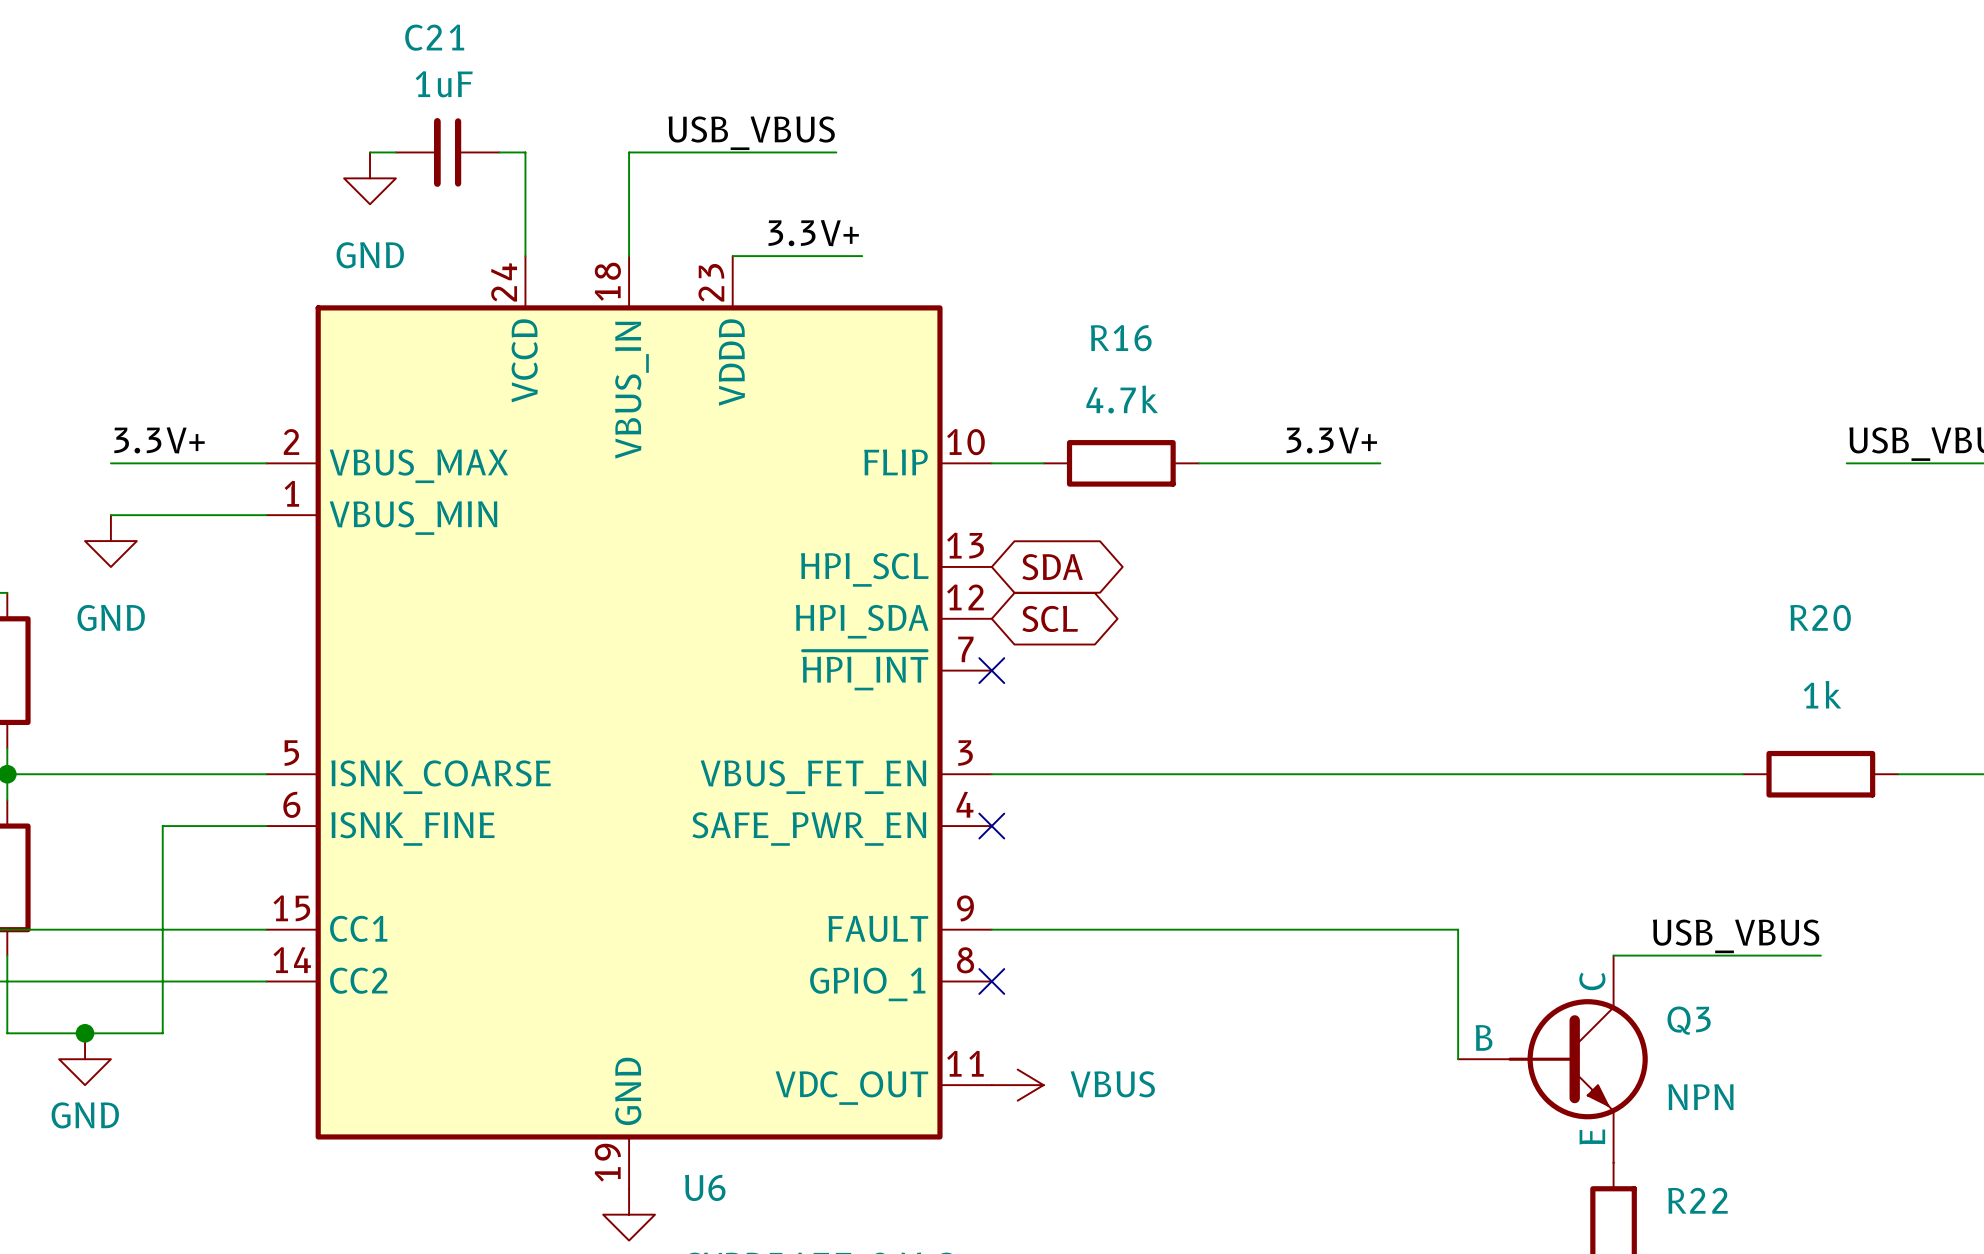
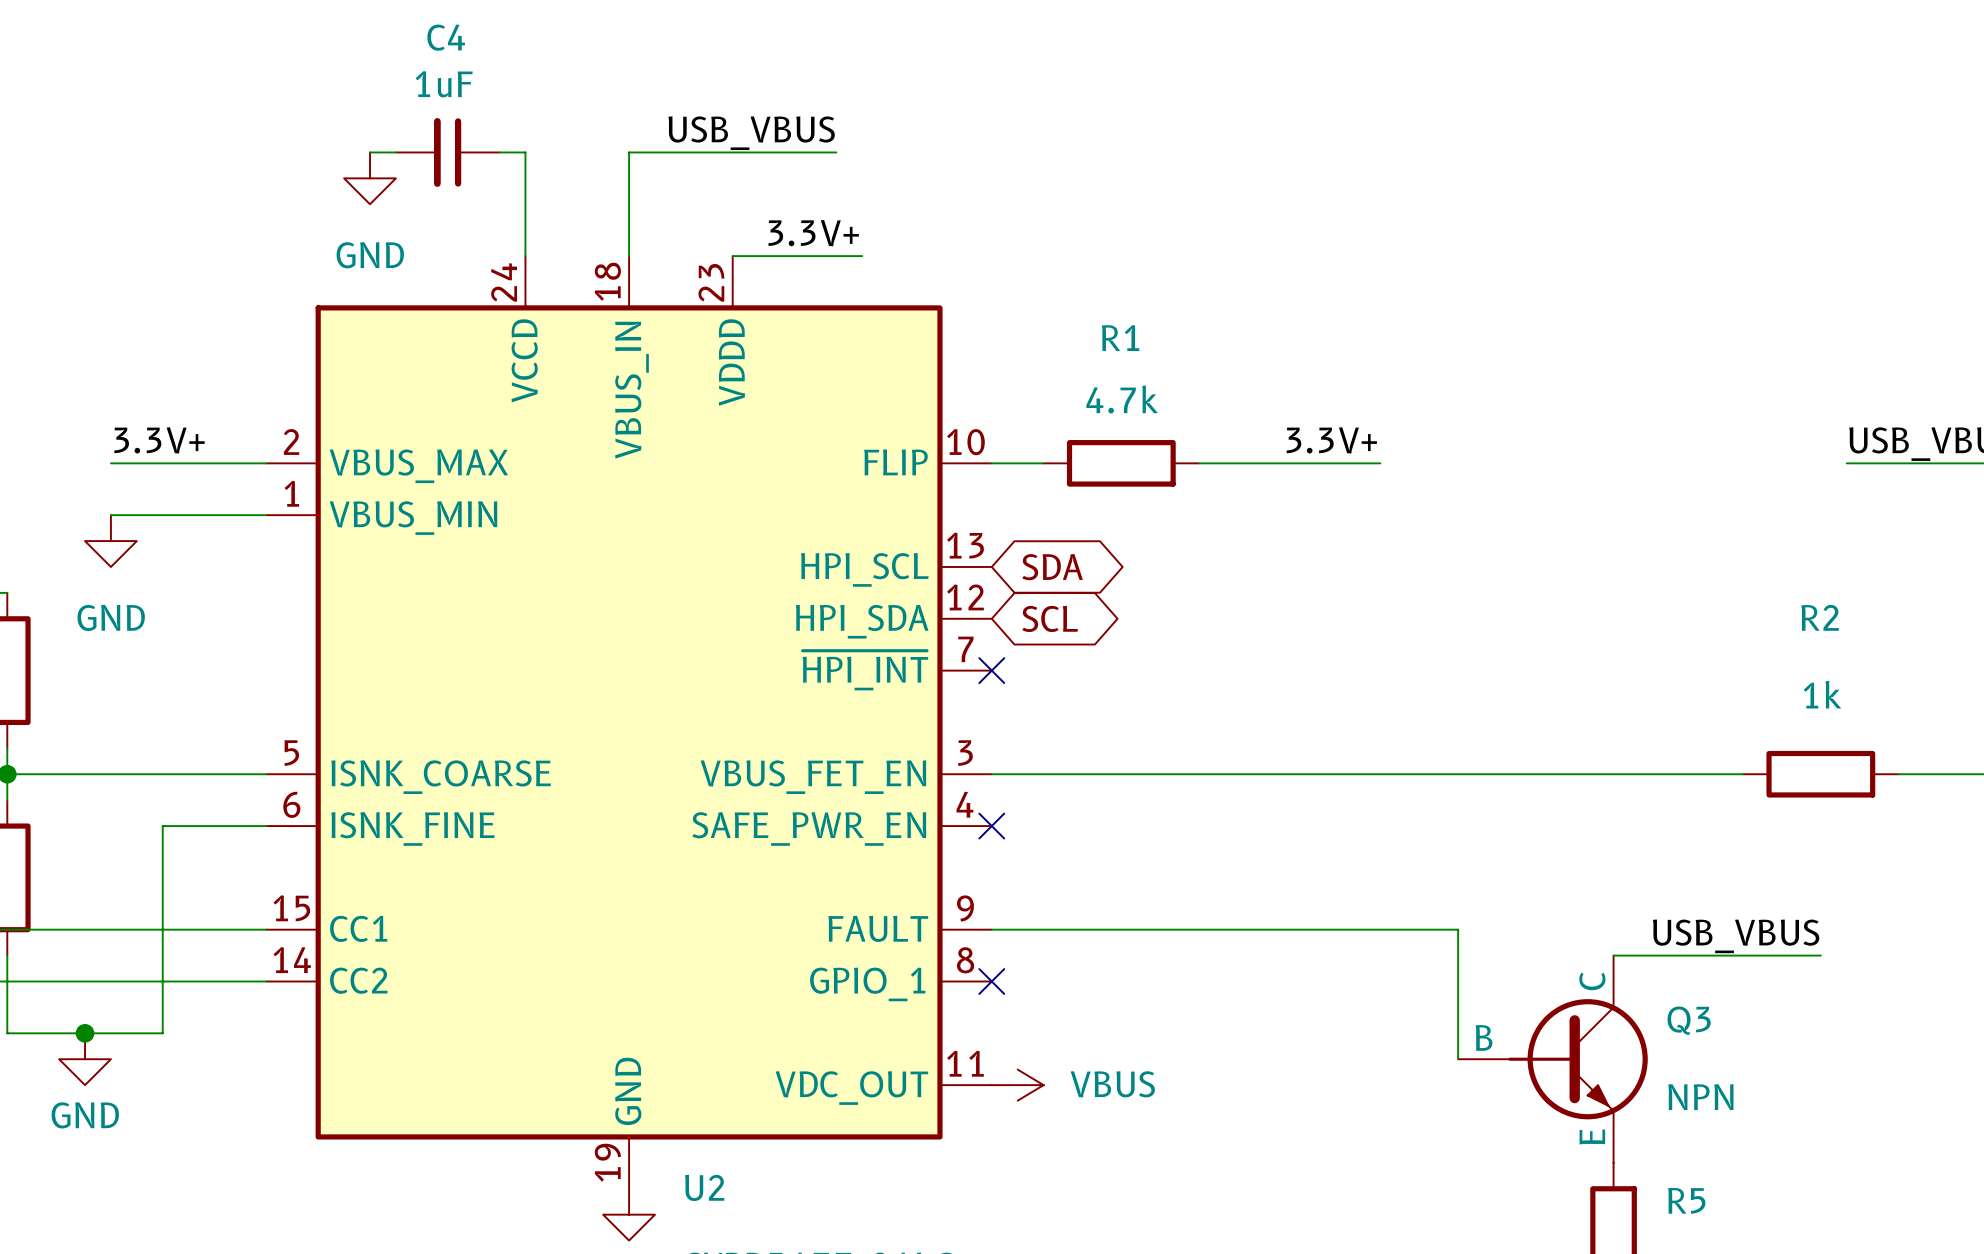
C21 name: C21 (434, 37) -> C4 (446, 37)
R16 name: R16 (1121, 338) -> R1 (1120, 338)
R20 name: R20 (1820, 618) -> R2 (1820, 617)
U6 name: U6 (705, 1187) -> U2 (704, 1187)
R22 name: R22 (1697, 1200) -> R5 (1686, 1200)

